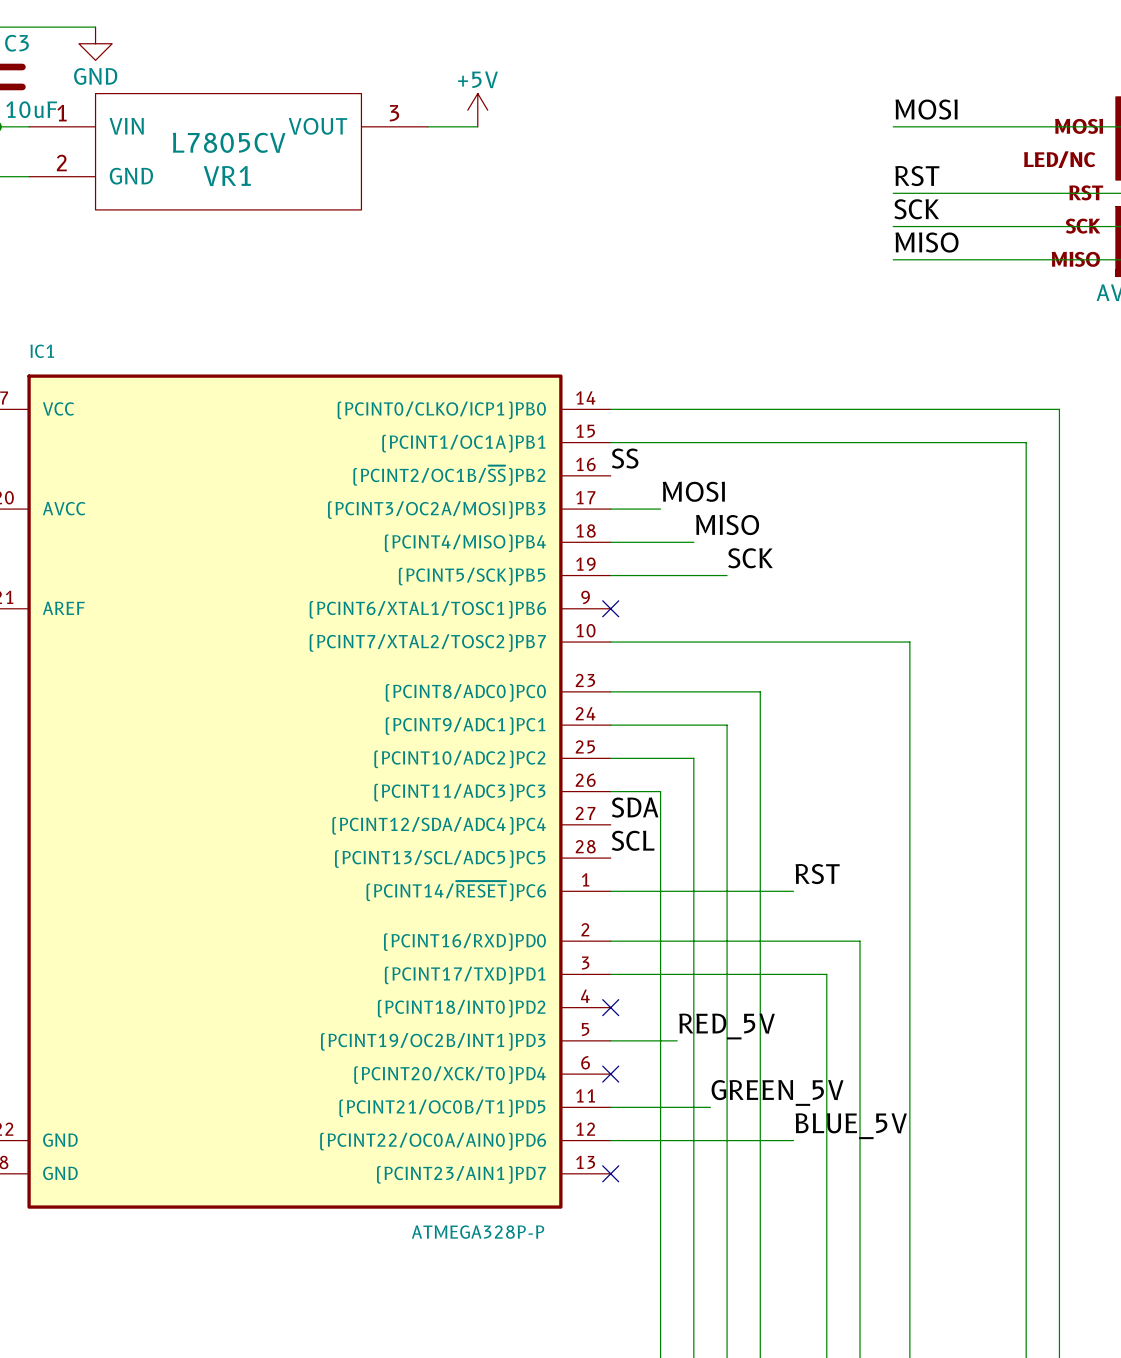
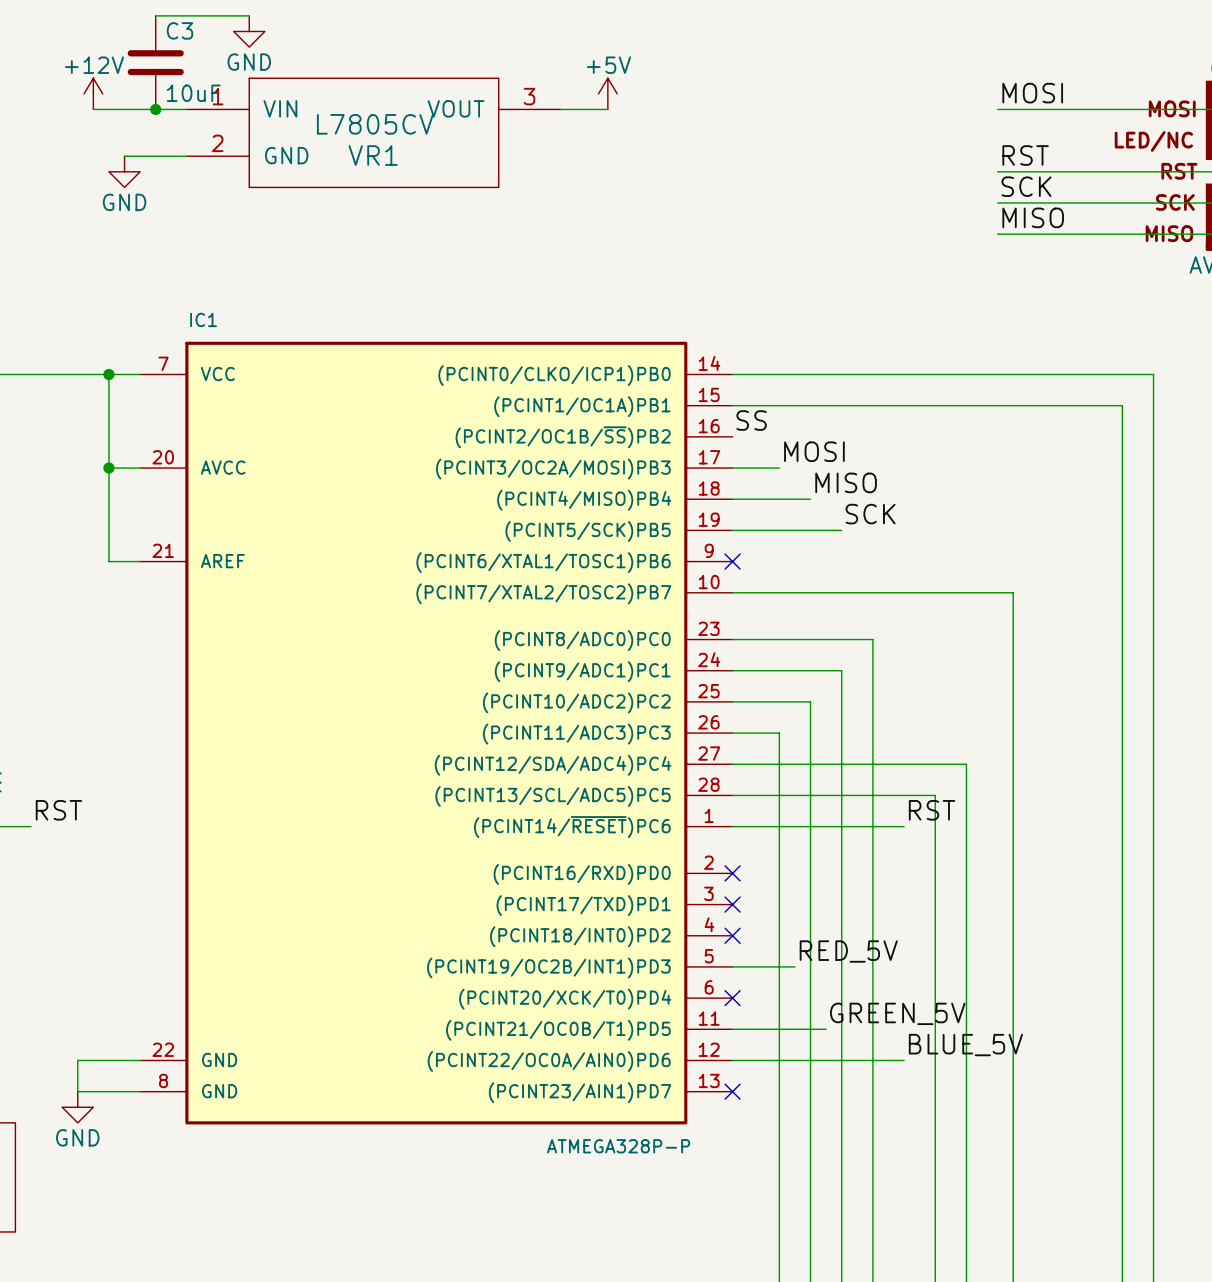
label: SDA (635, 807) -> none
label: SCL (633, 840) -> none
wire: (610, 941) (860, 941) -> (732, 764) (966, 764) (966, 873)
no-connect mark: none -> (732, 873)
wire: (610, 974) (826, 974) -> (732, 795) (935, 795) (935, 904)
no-connect mark: none -> (732, 904)

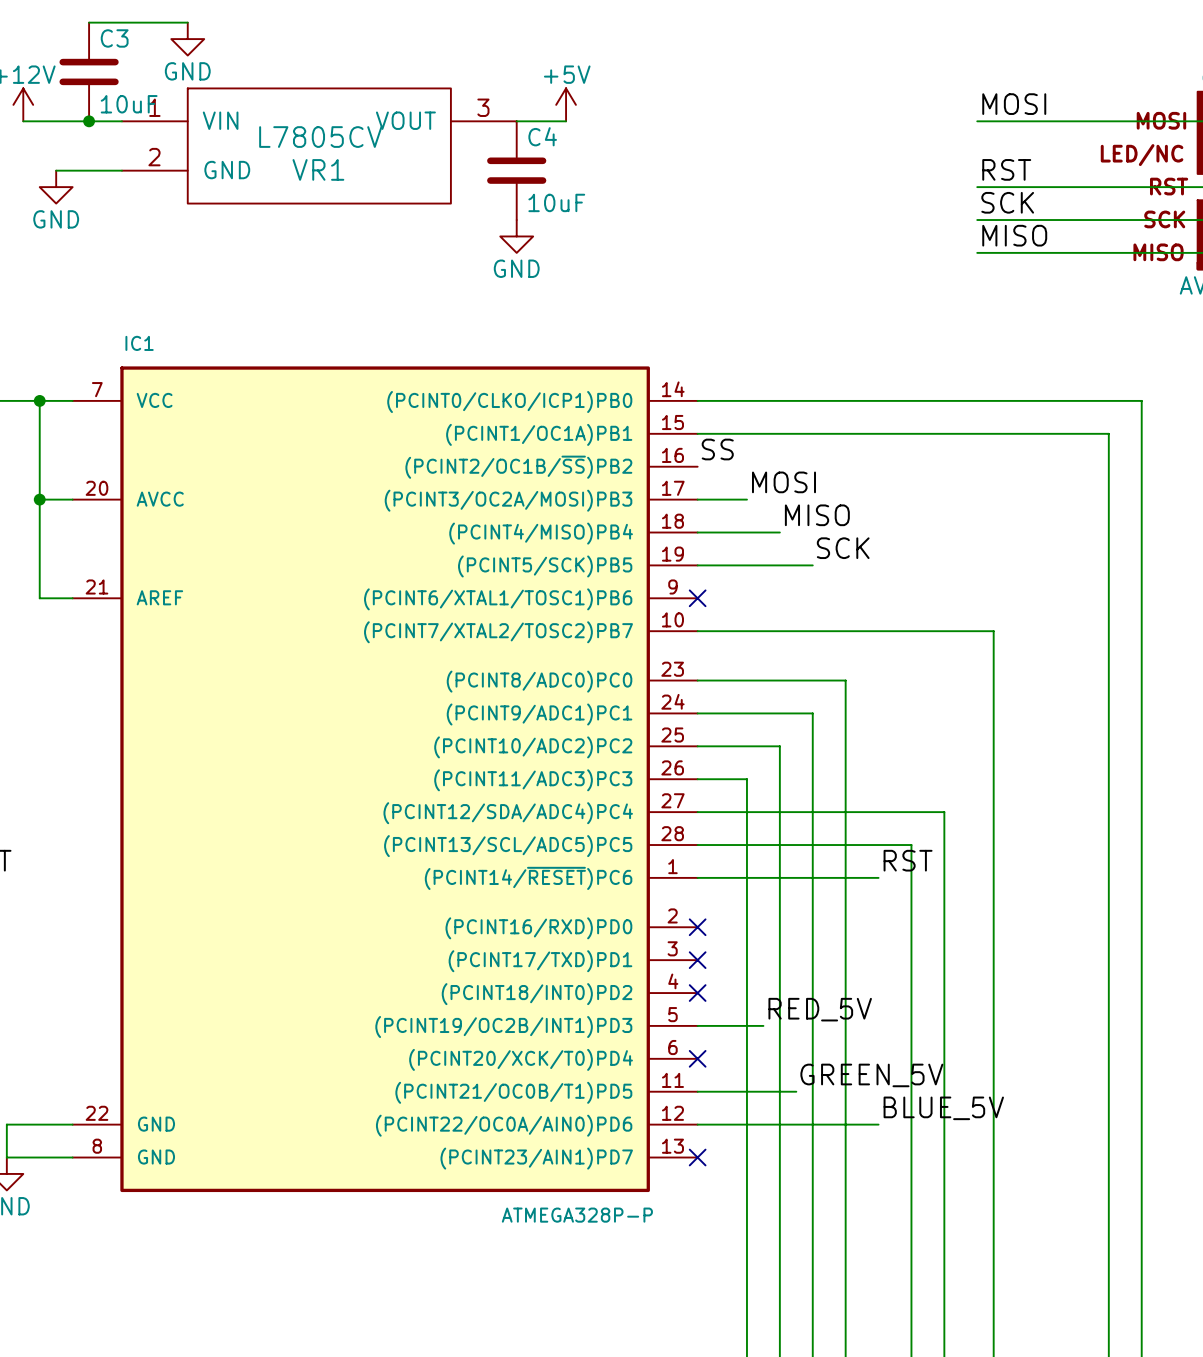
C4: none -> 10uF (516, 170)
power symbol: none -> GND (516, 236)

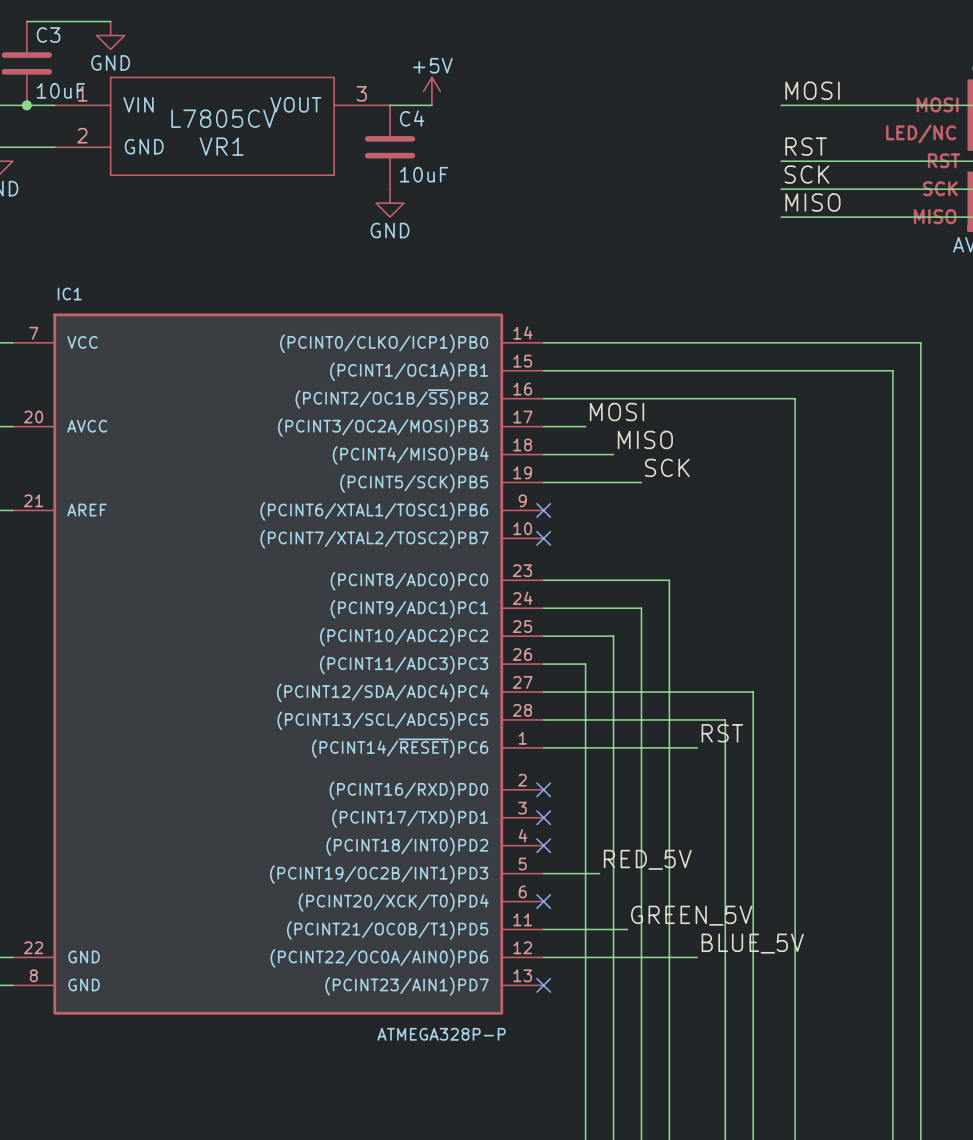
label: SS (717, 449) -> none
wire: (697, 631) (993, 631) -> (543, 398) (795, 398) (795, 538)
no-connect mark: none -> (543, 538)

